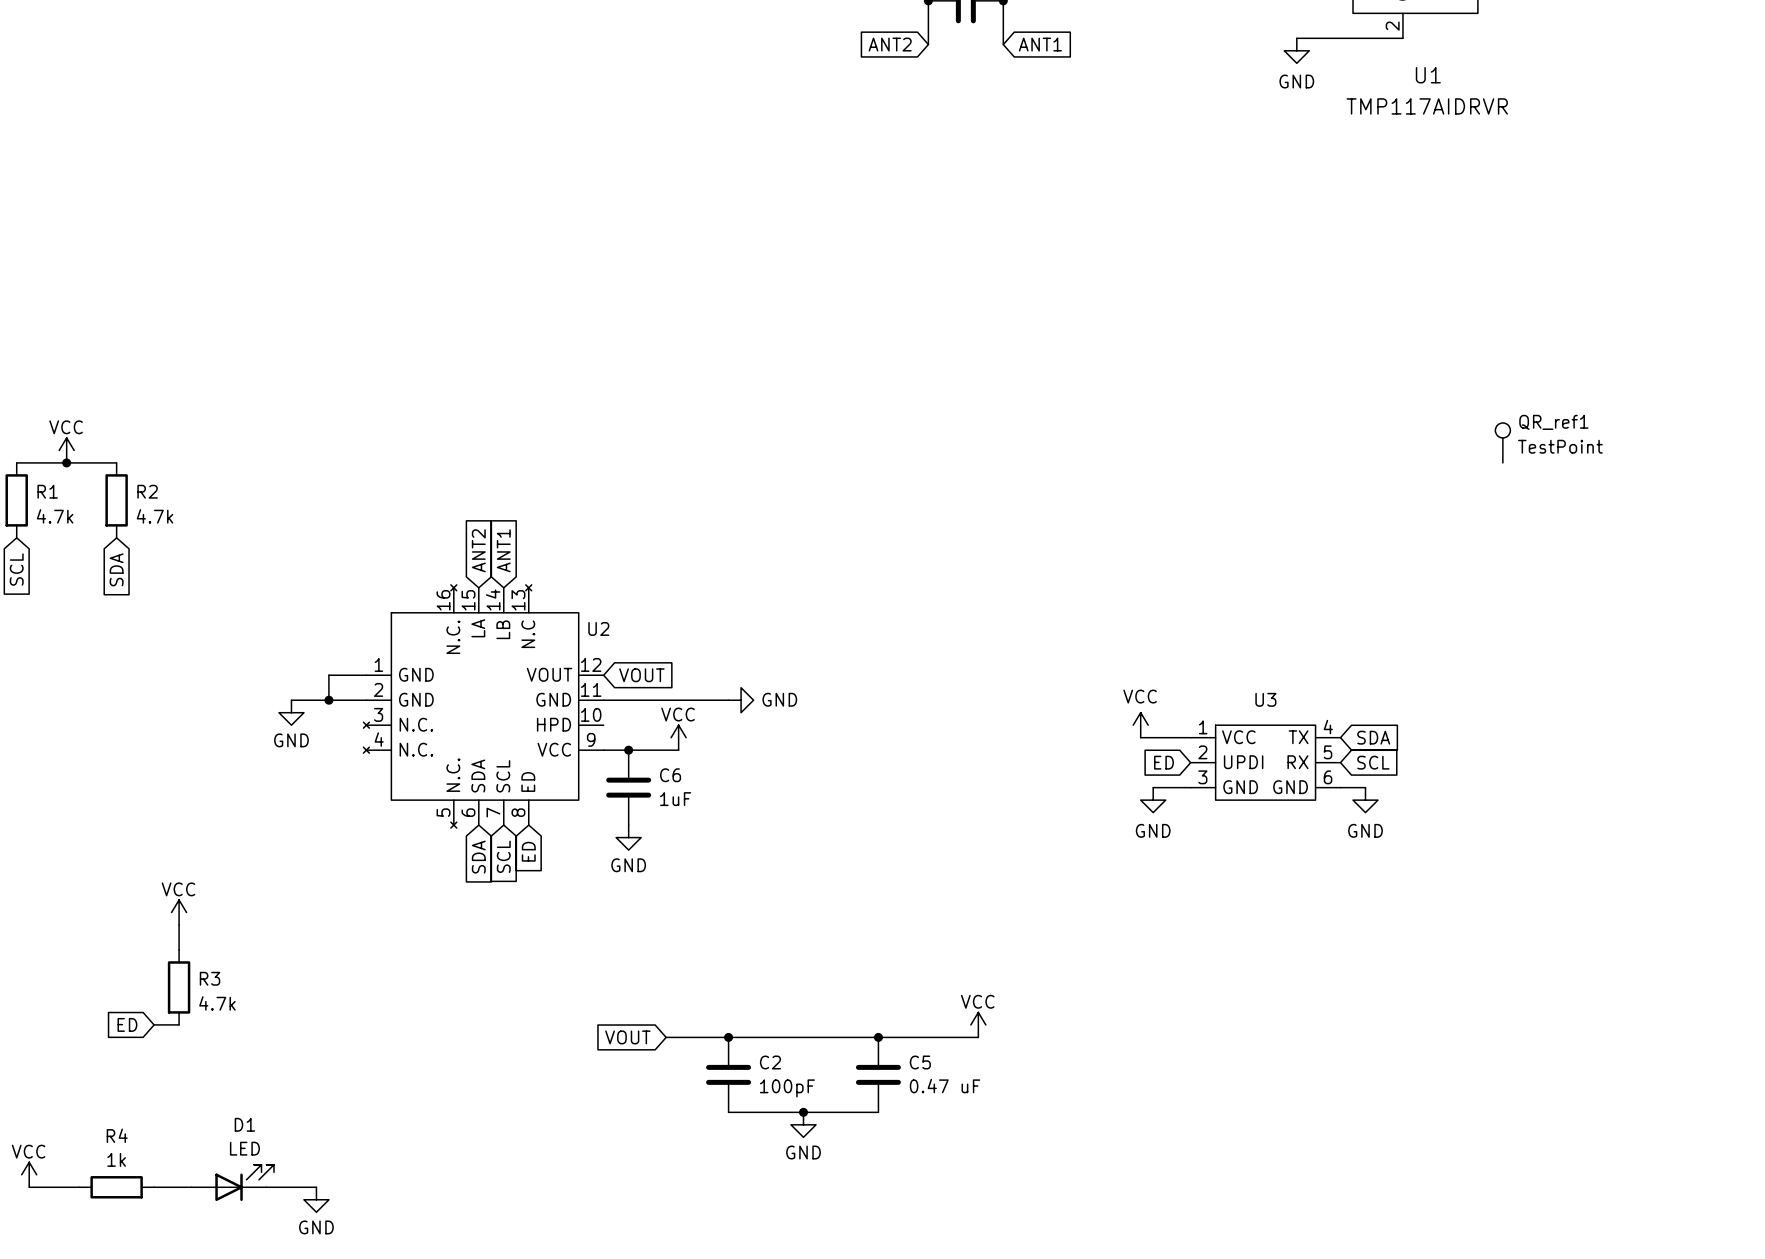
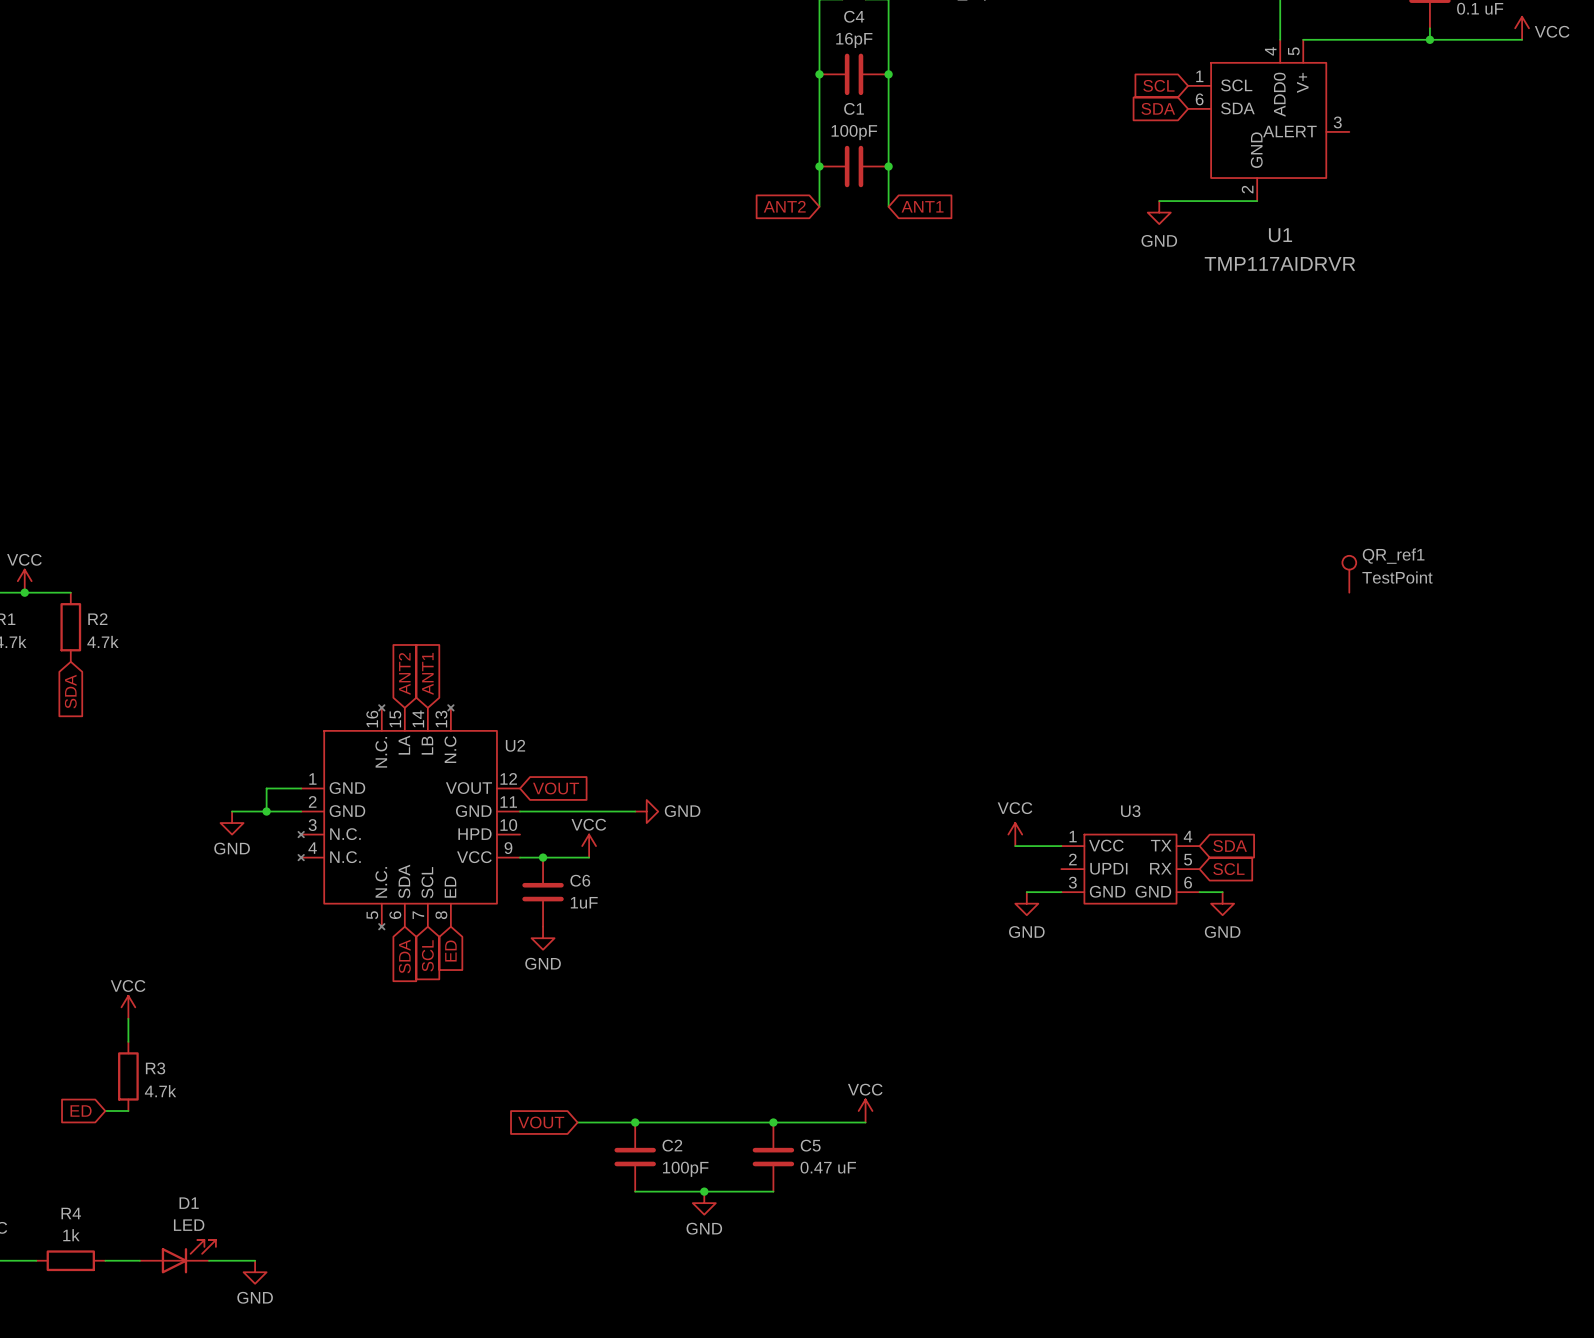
global label: ED (1164, 762) -> none

